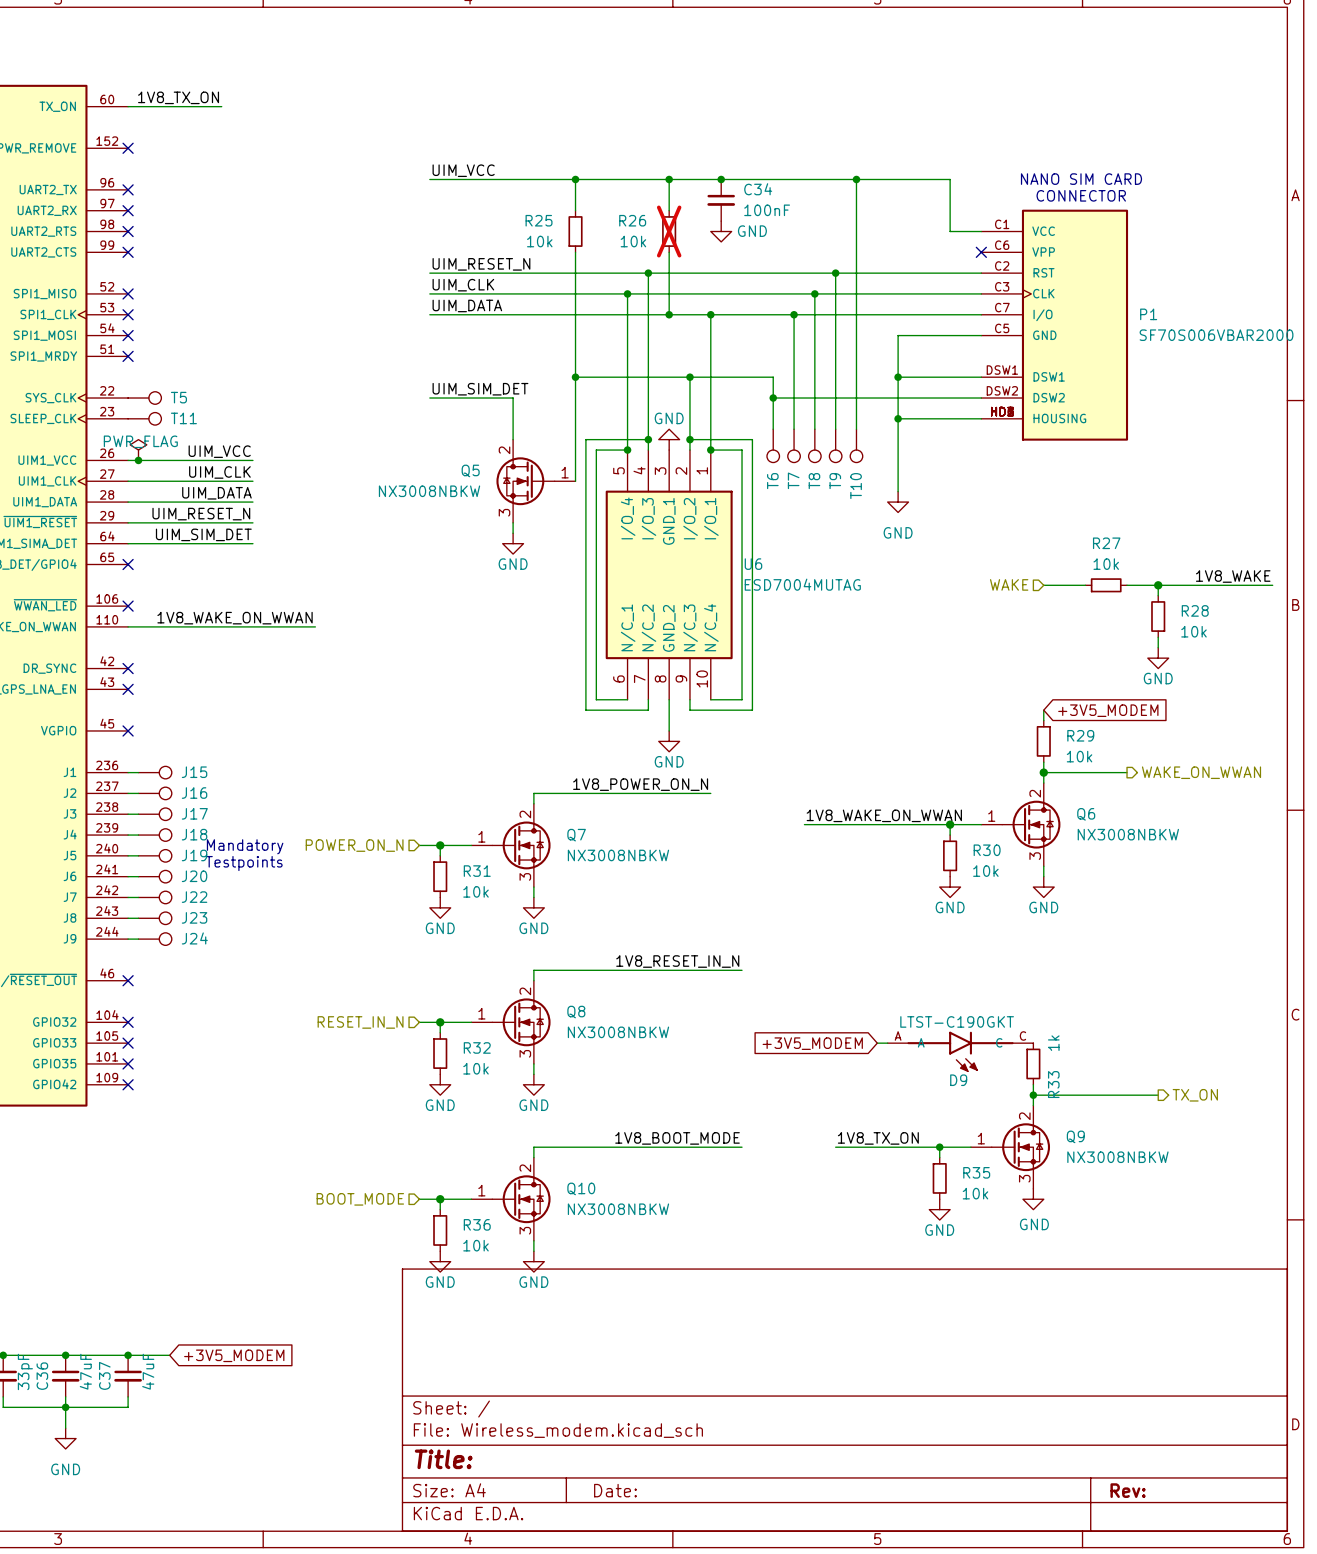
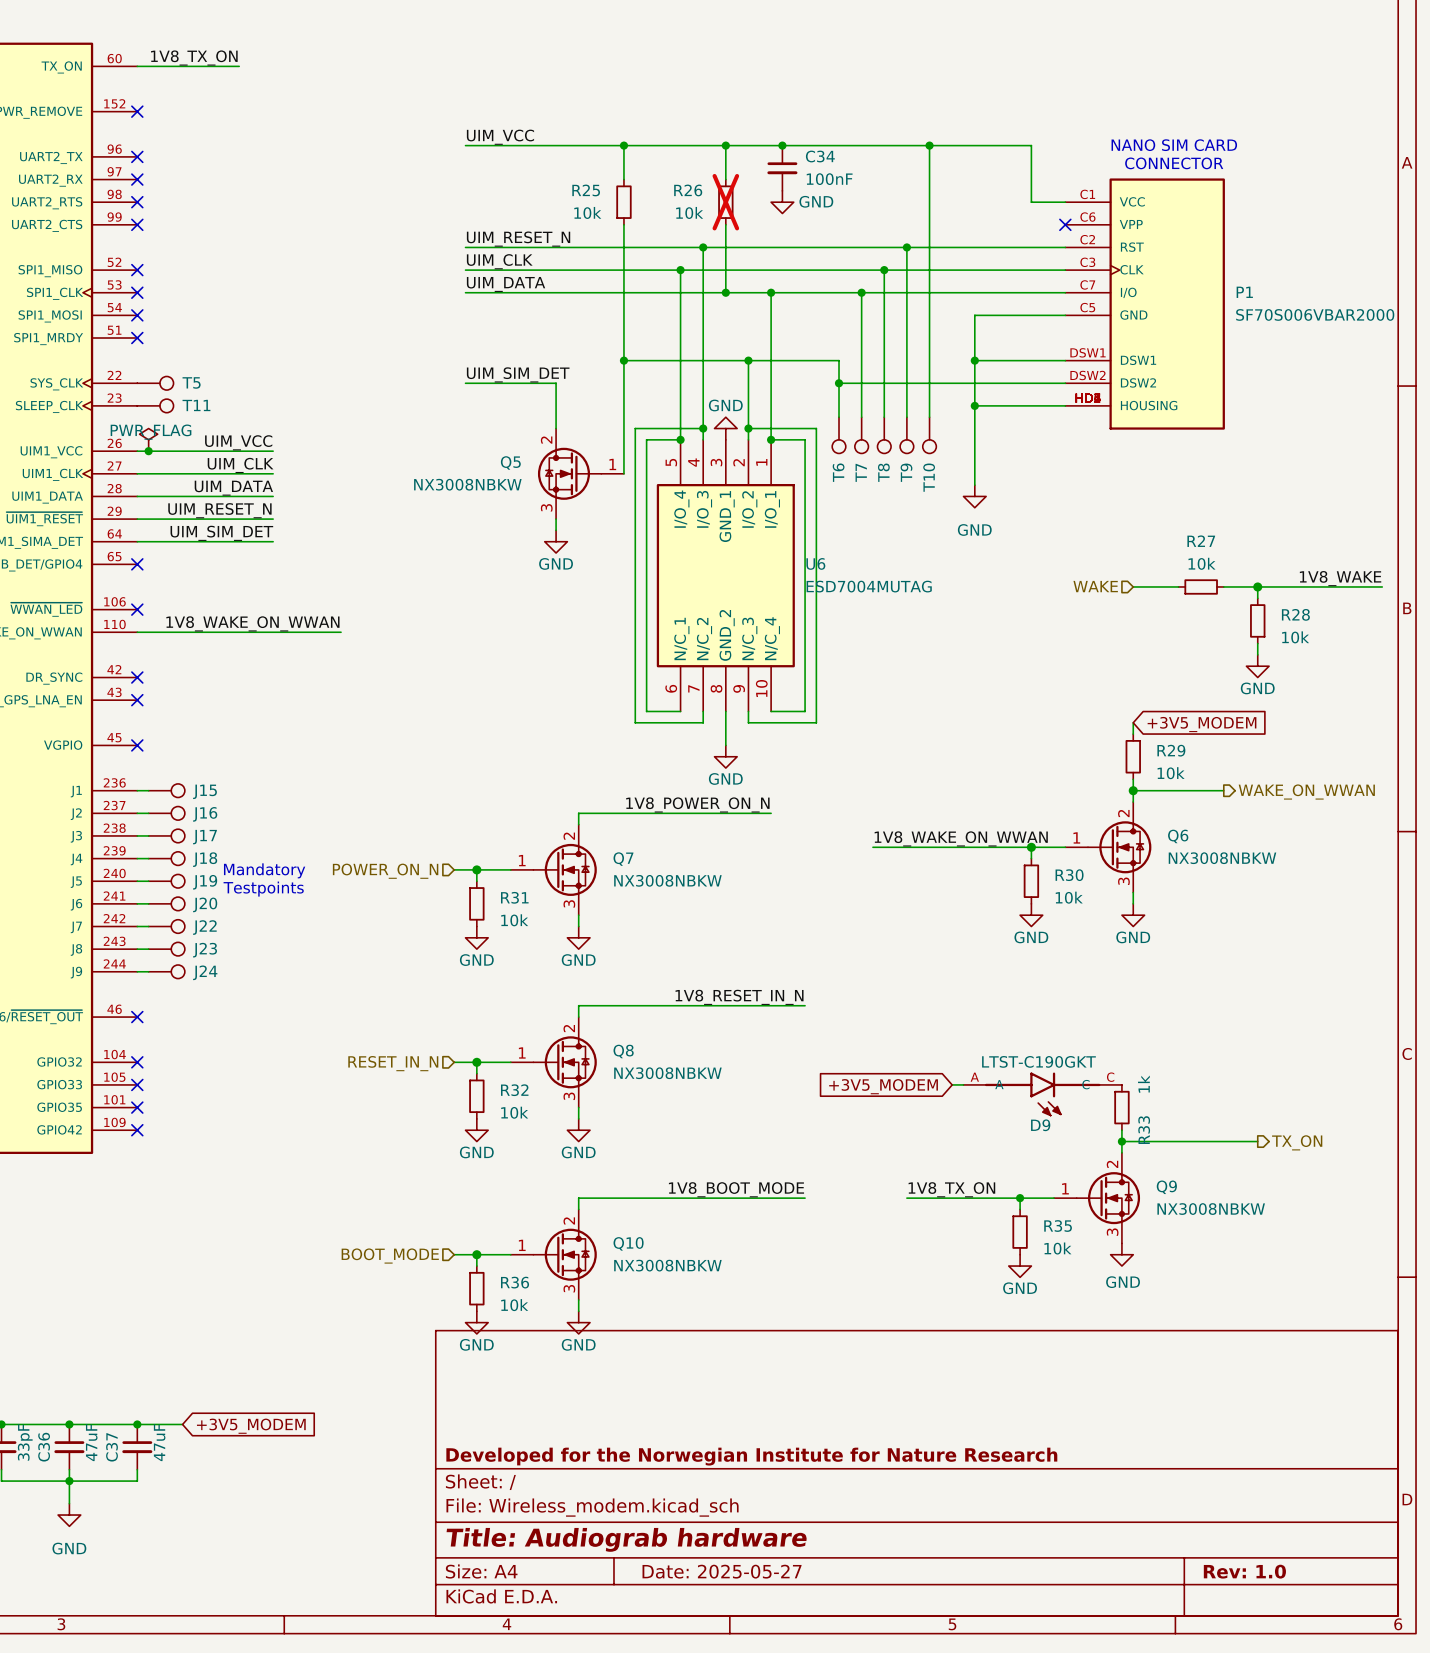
title block: none -> Developed for the Norwegian Institute for Nature Research (751, 1456)
title block: Title: (443, 1459) -> Title: Audiograb hardware (626, 1539)
title block: Date: (615, 1490) -> Date: 2025-05-27 (722, 1571)
title block: Rev: (1128, 1490) -> Rev: 1.0 (1244, 1571)

